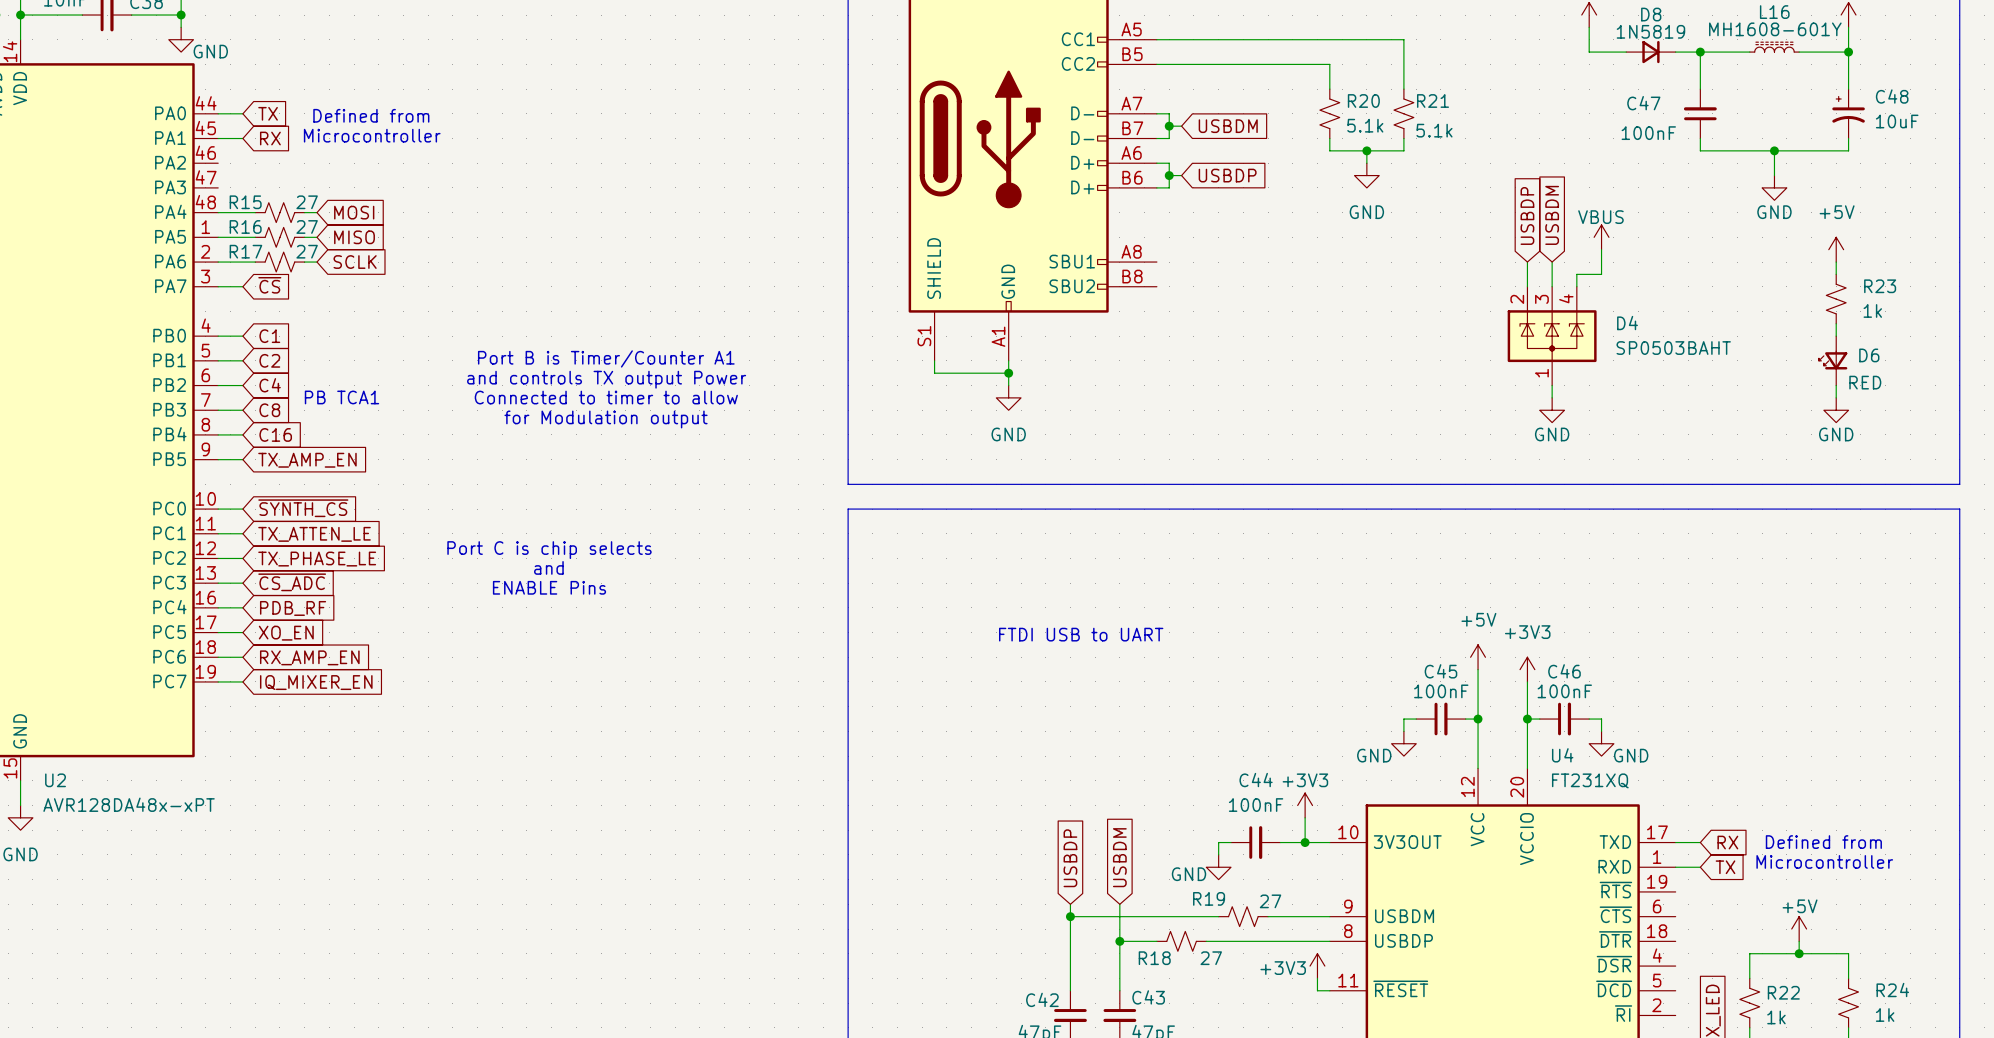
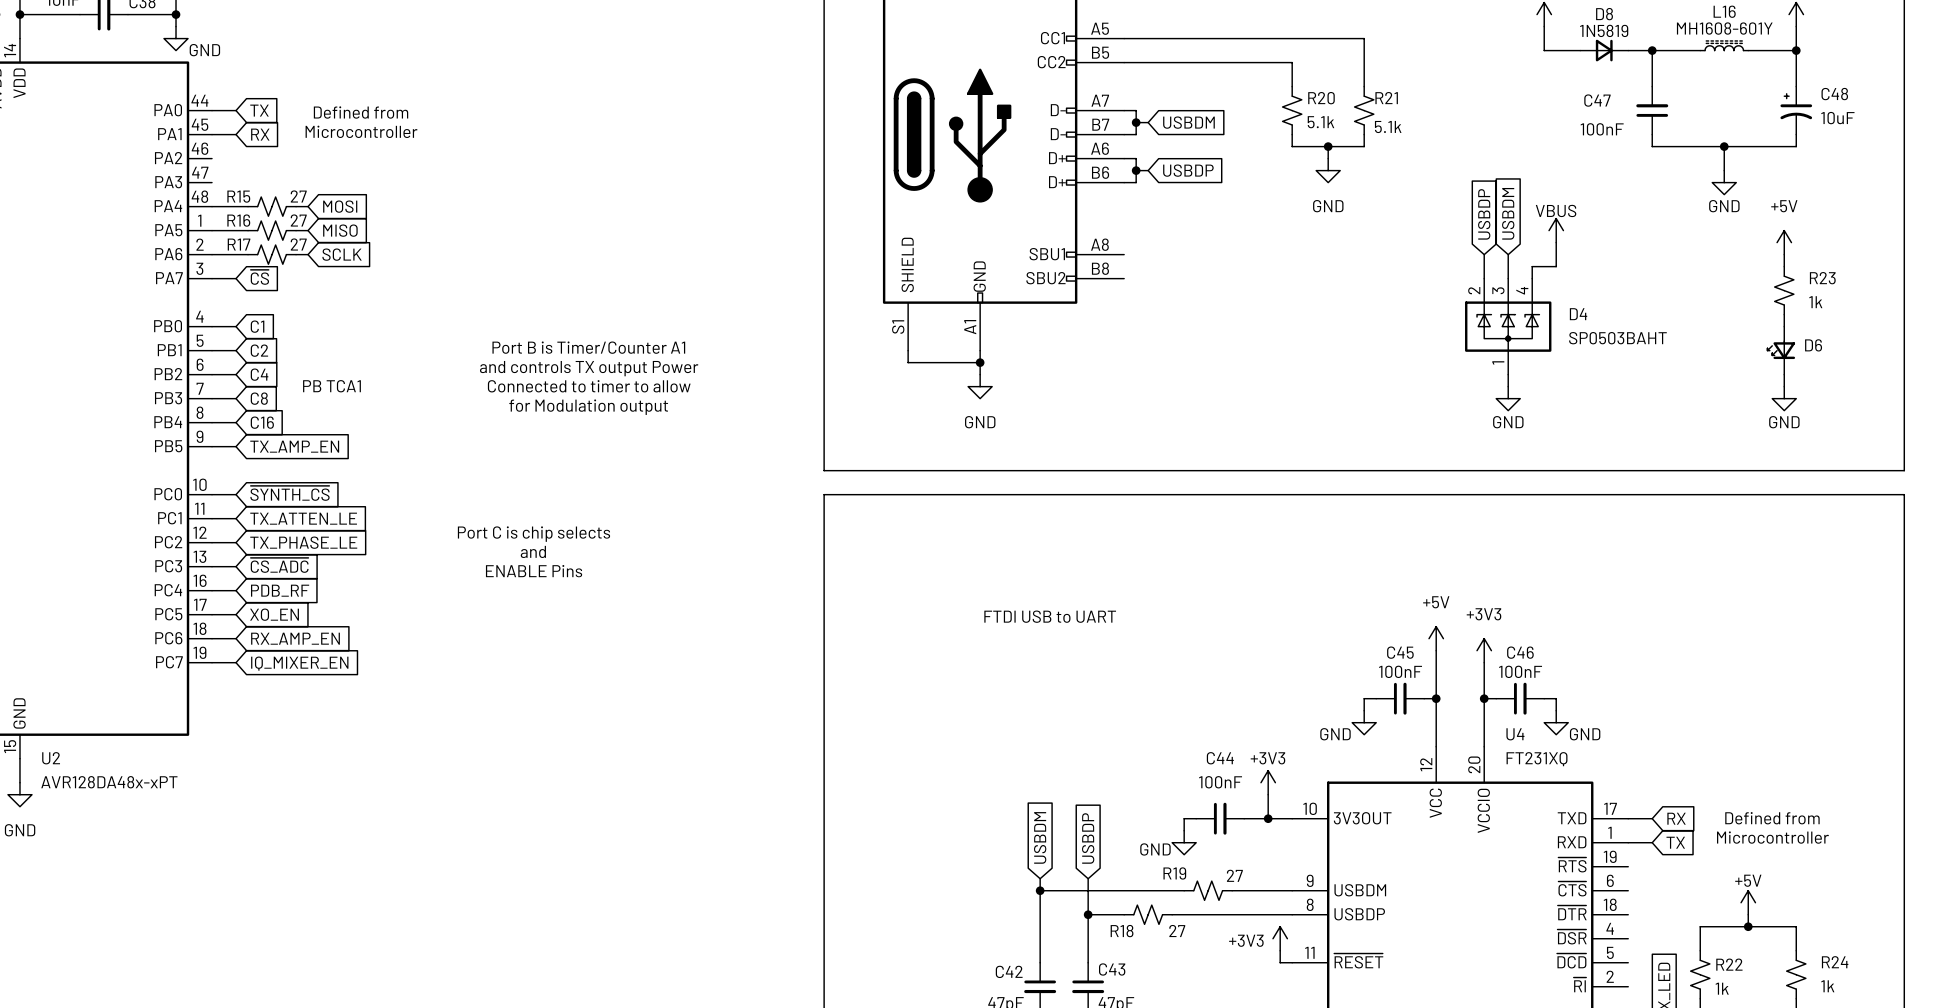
D6 value: RED (1865, 382) -> none
global label: USBDM (1119, 857) -> USBDP (1088, 838)
global label: USBDP (1070, 858) -> USBDM (1040, 837)

